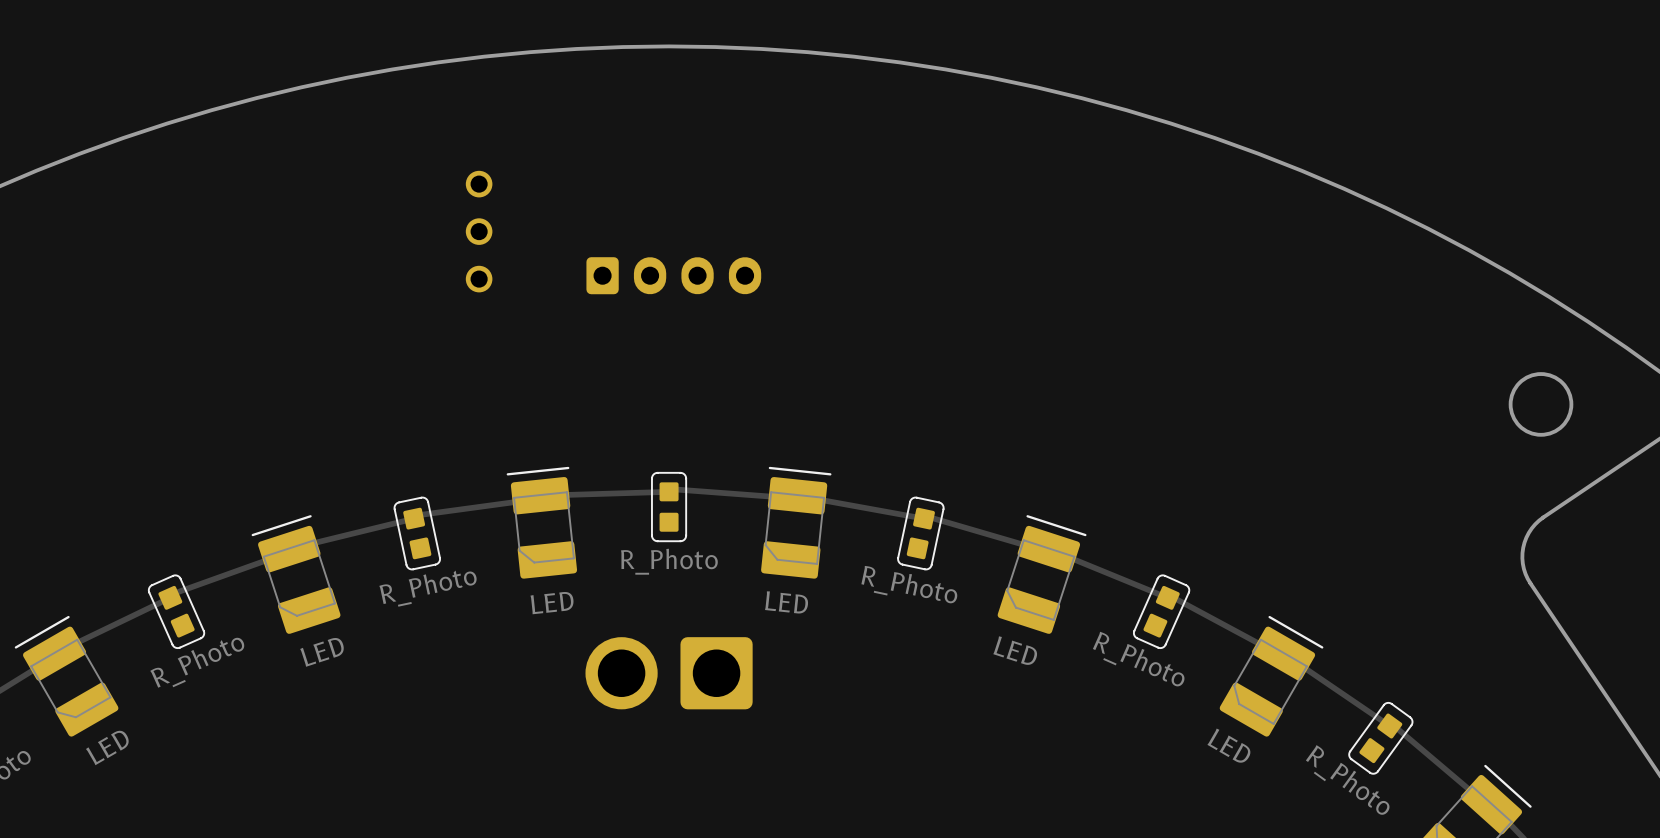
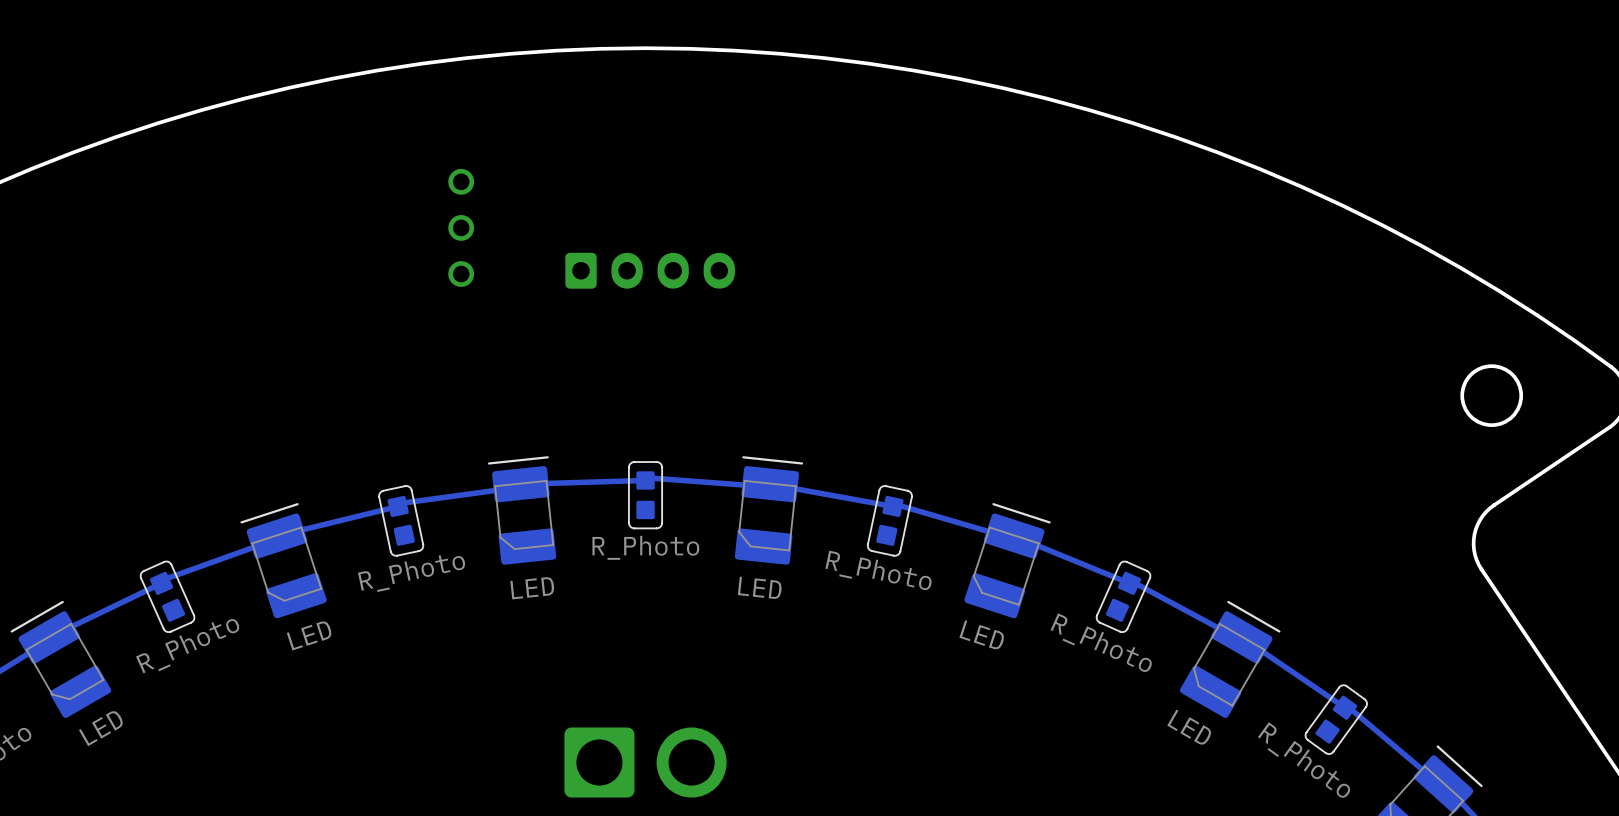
part rotation: 0° (669, 673) -> 180° (645, 762)
part position: (669, 673) -> (645, 762)

